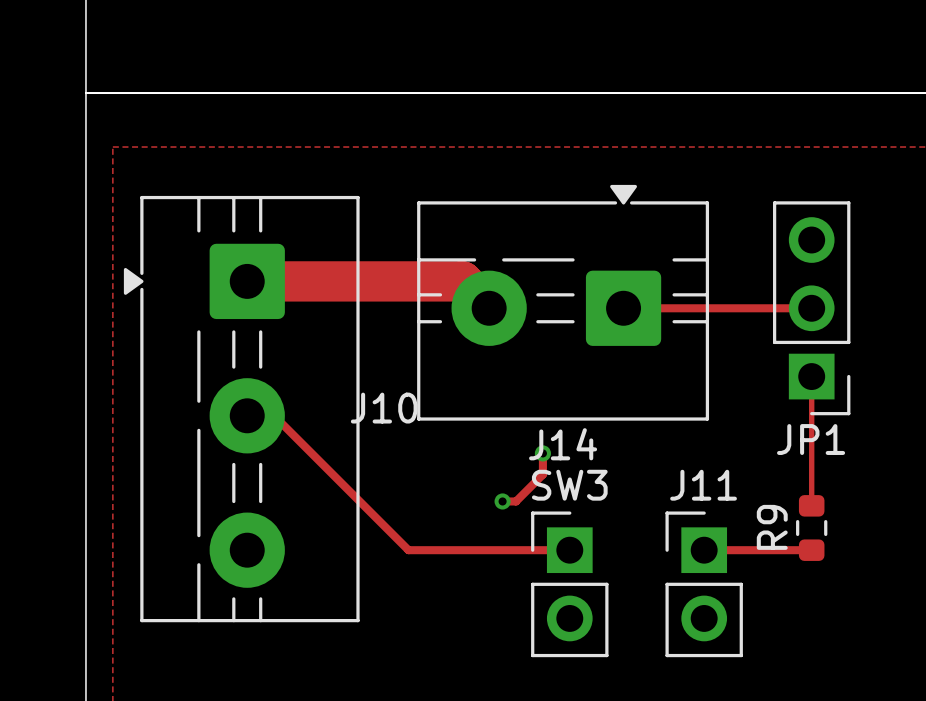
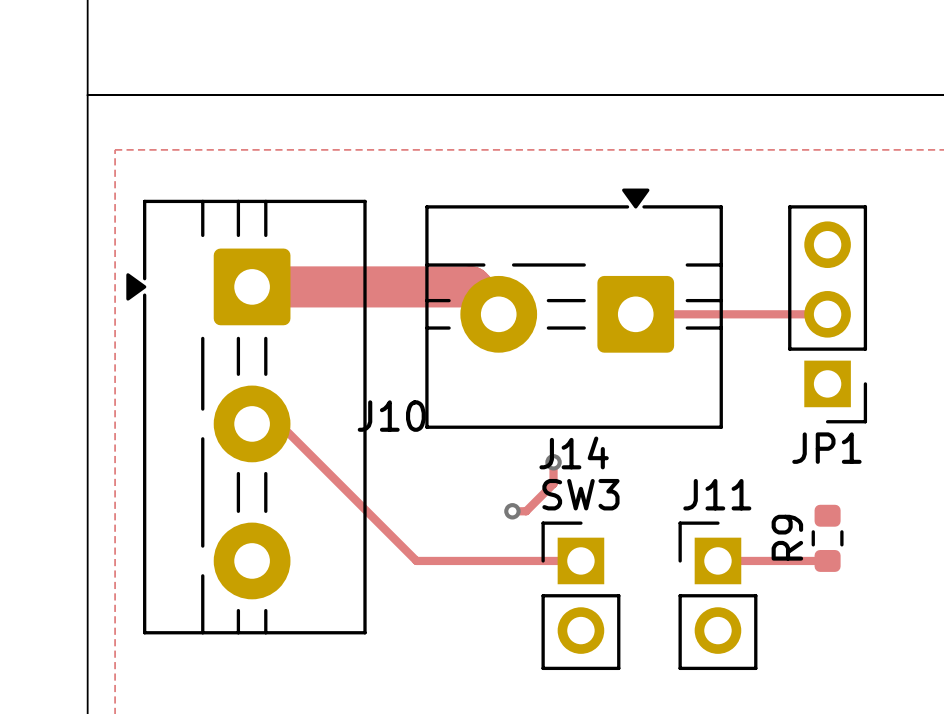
track: (811, 376) (811, 496) -> none

